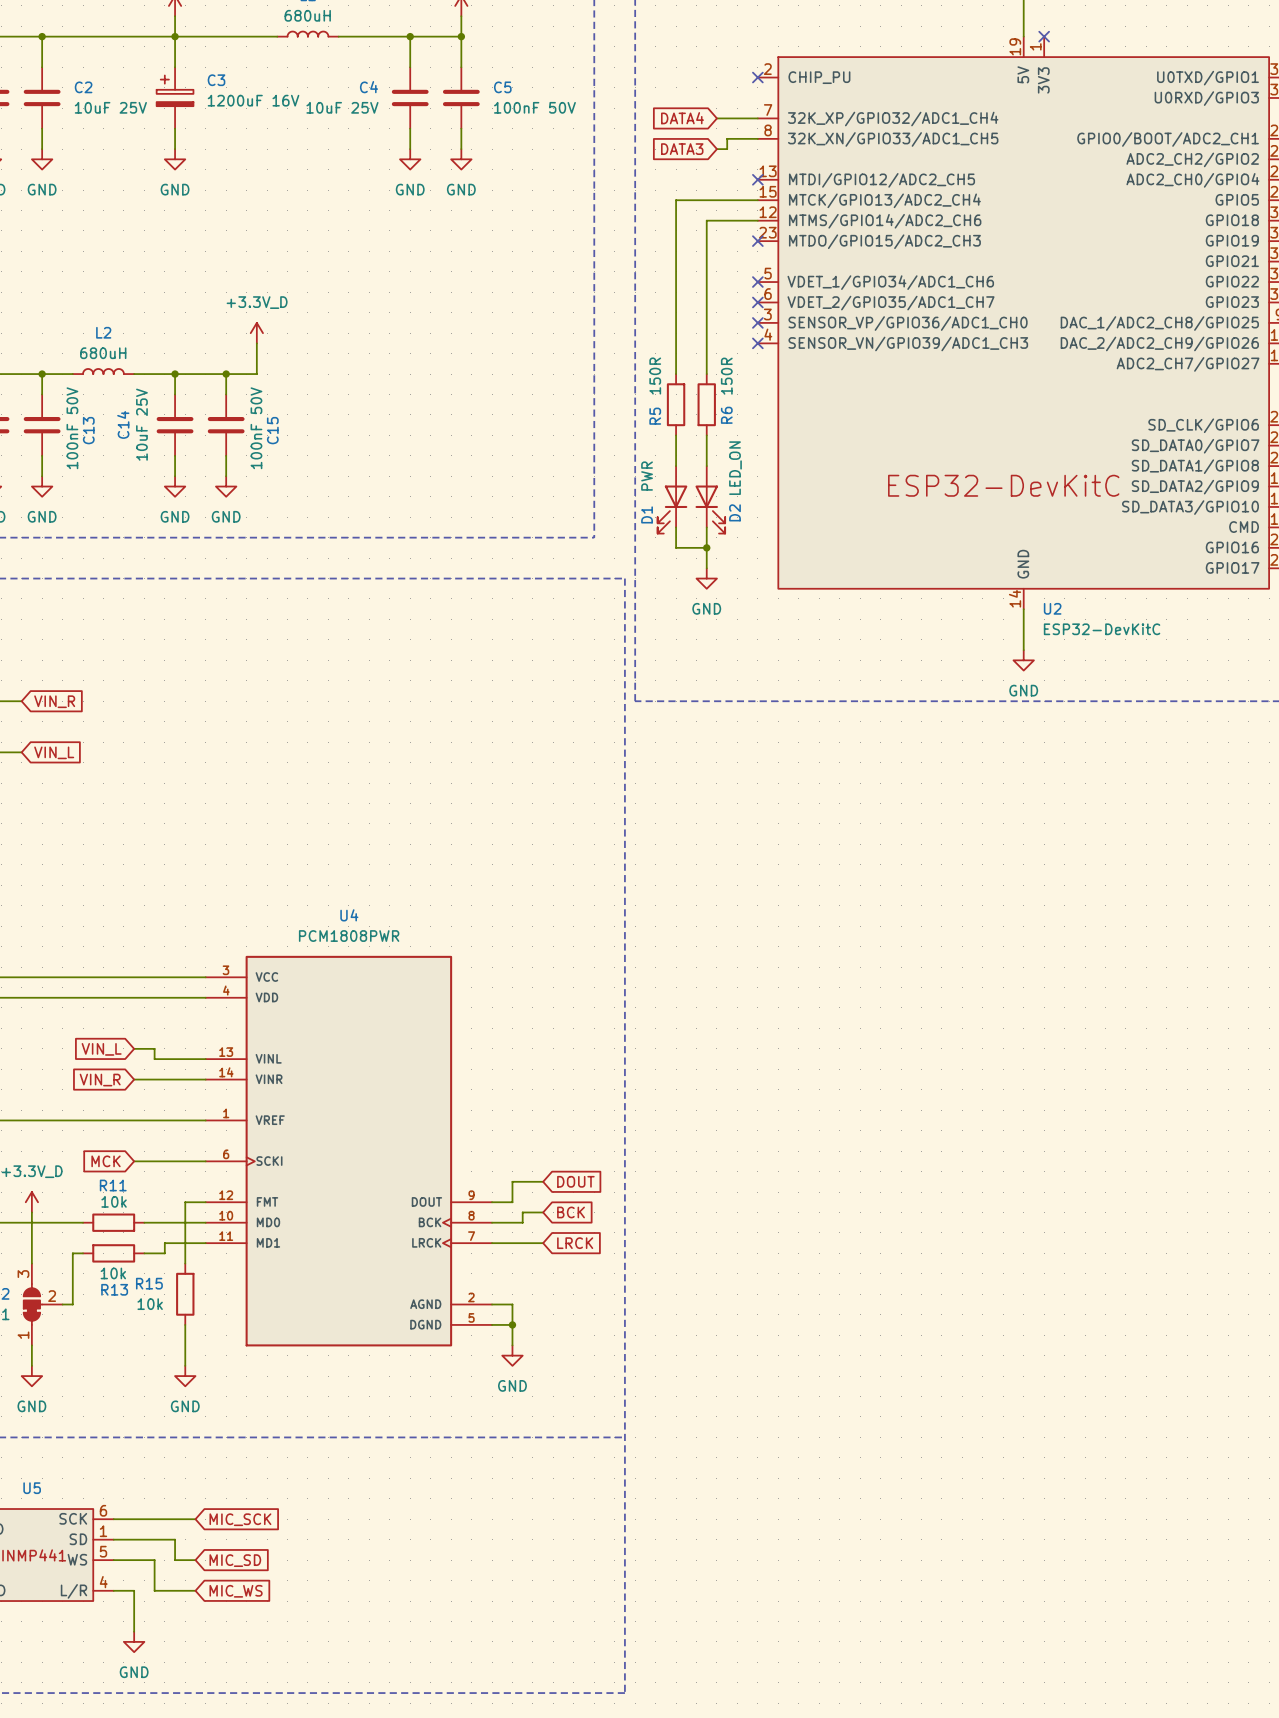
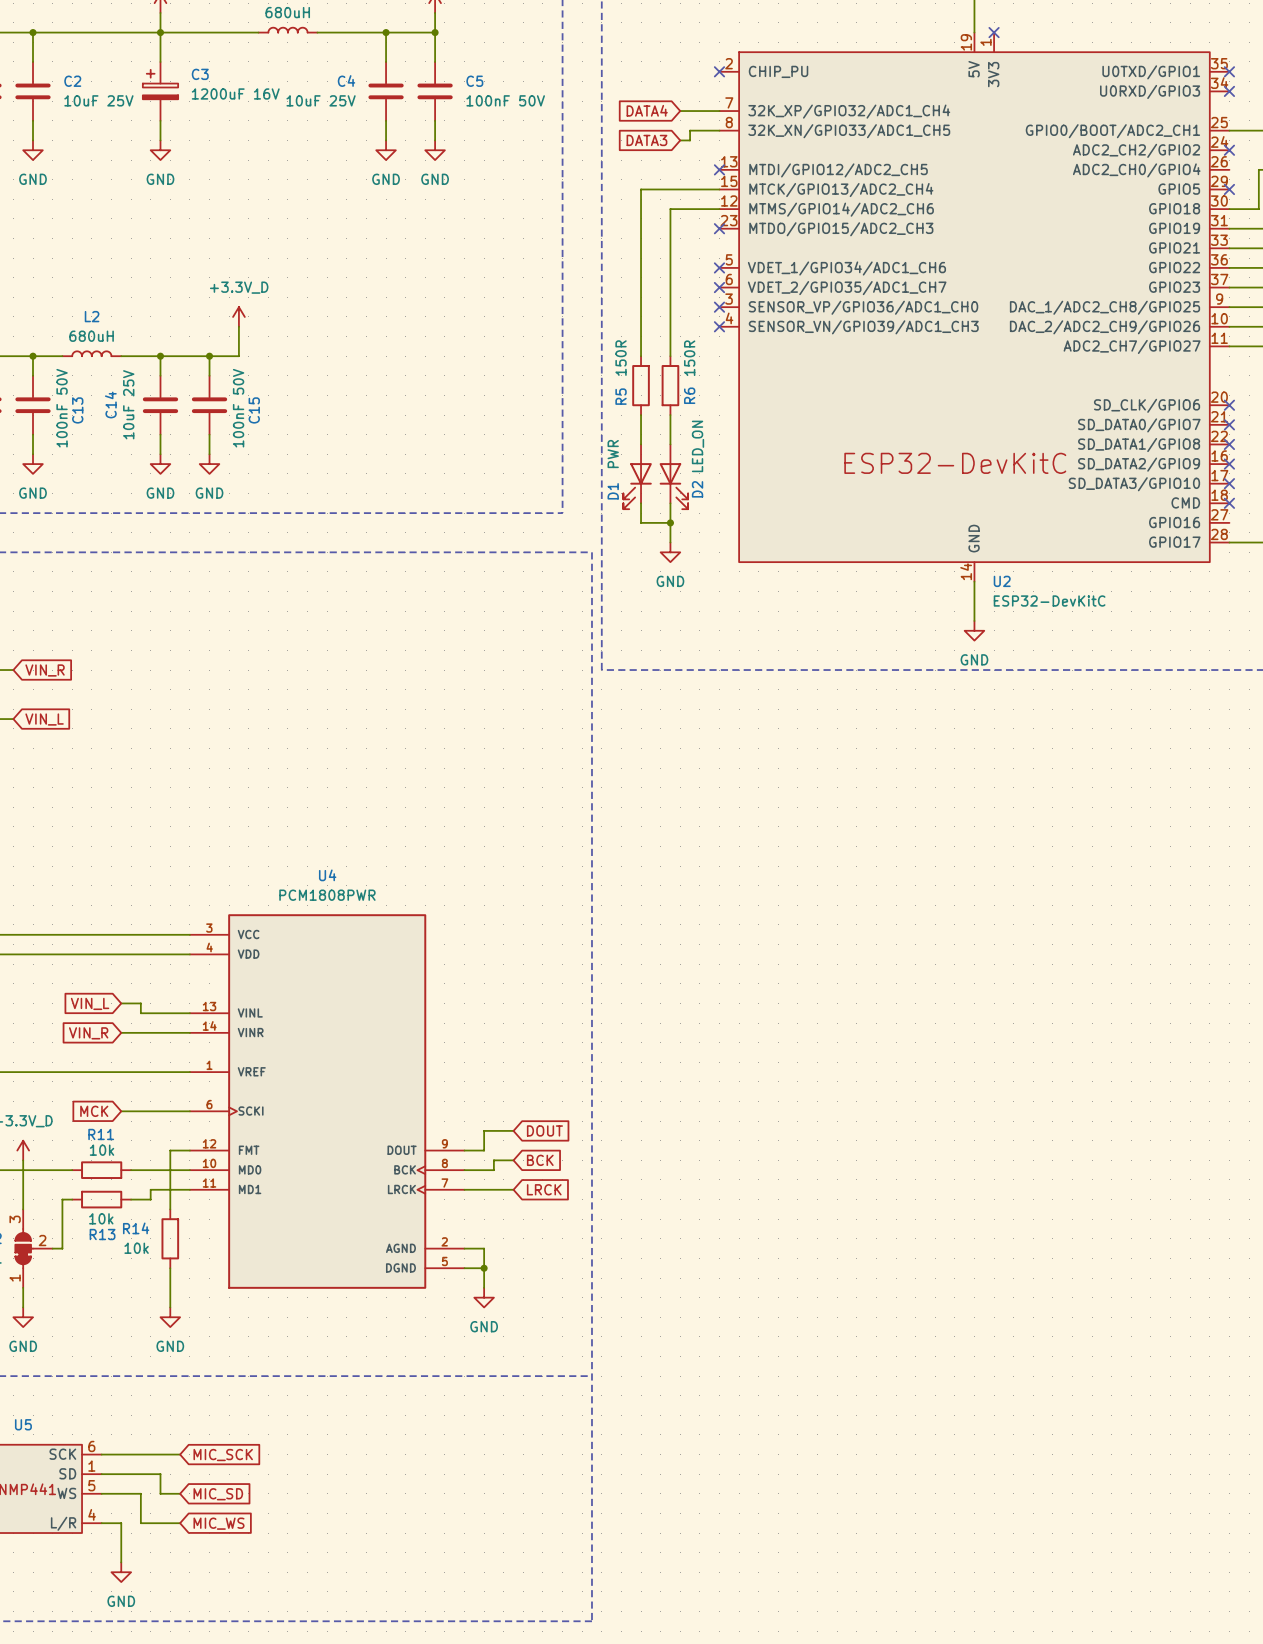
R15 name: R15 (149, 1283) -> R14 (136, 1228)

